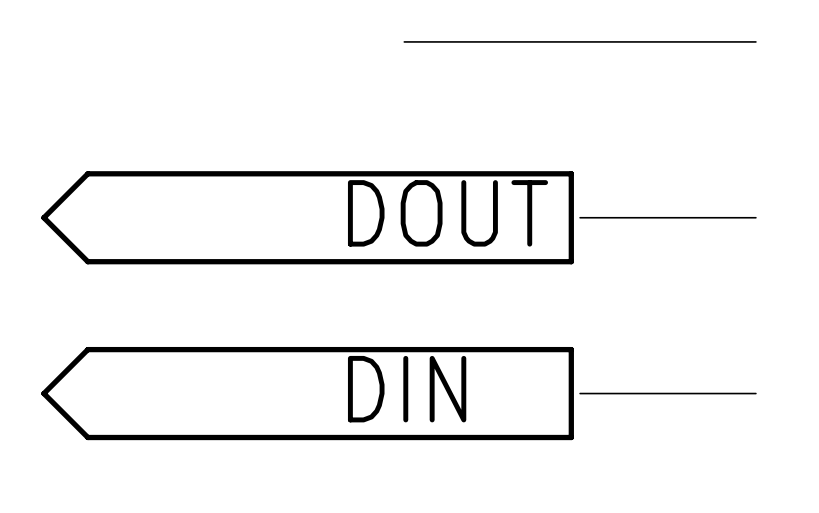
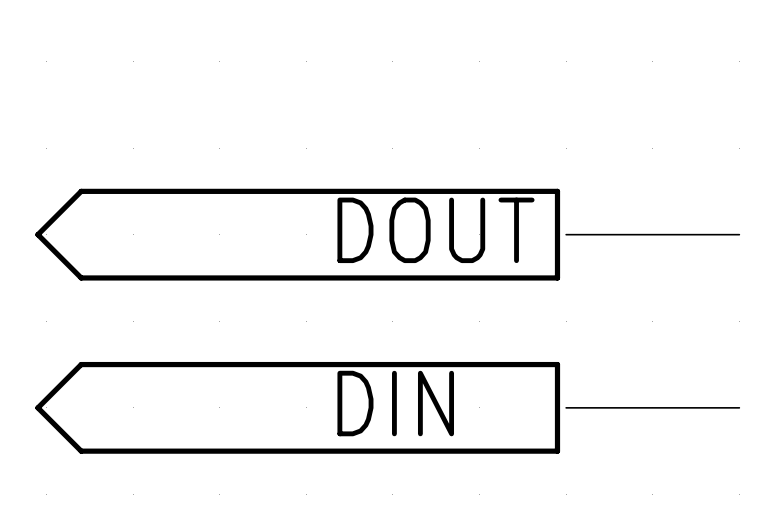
wire: (404, 41) (755, 41) -> none

